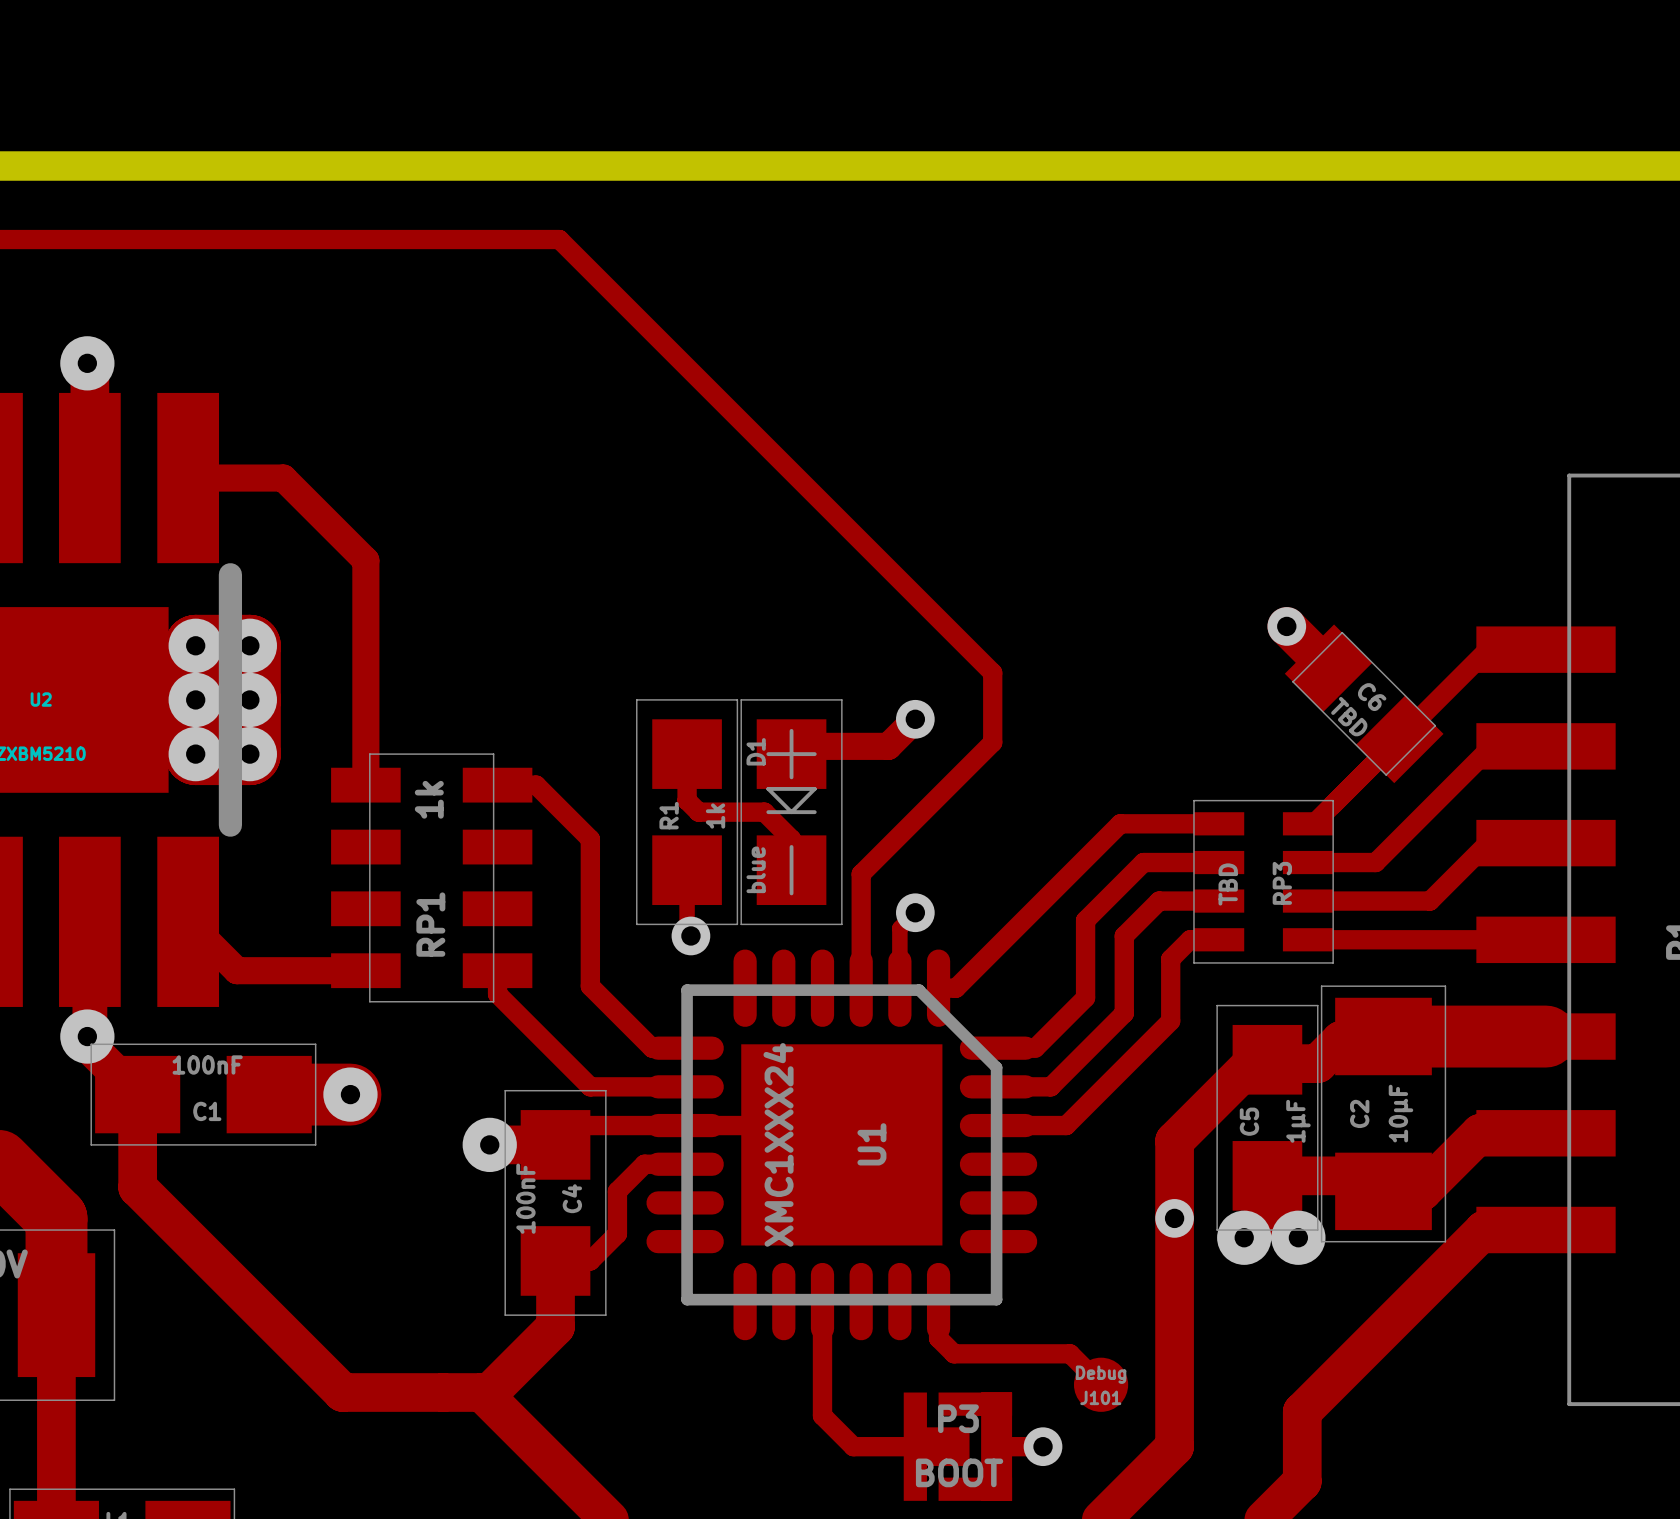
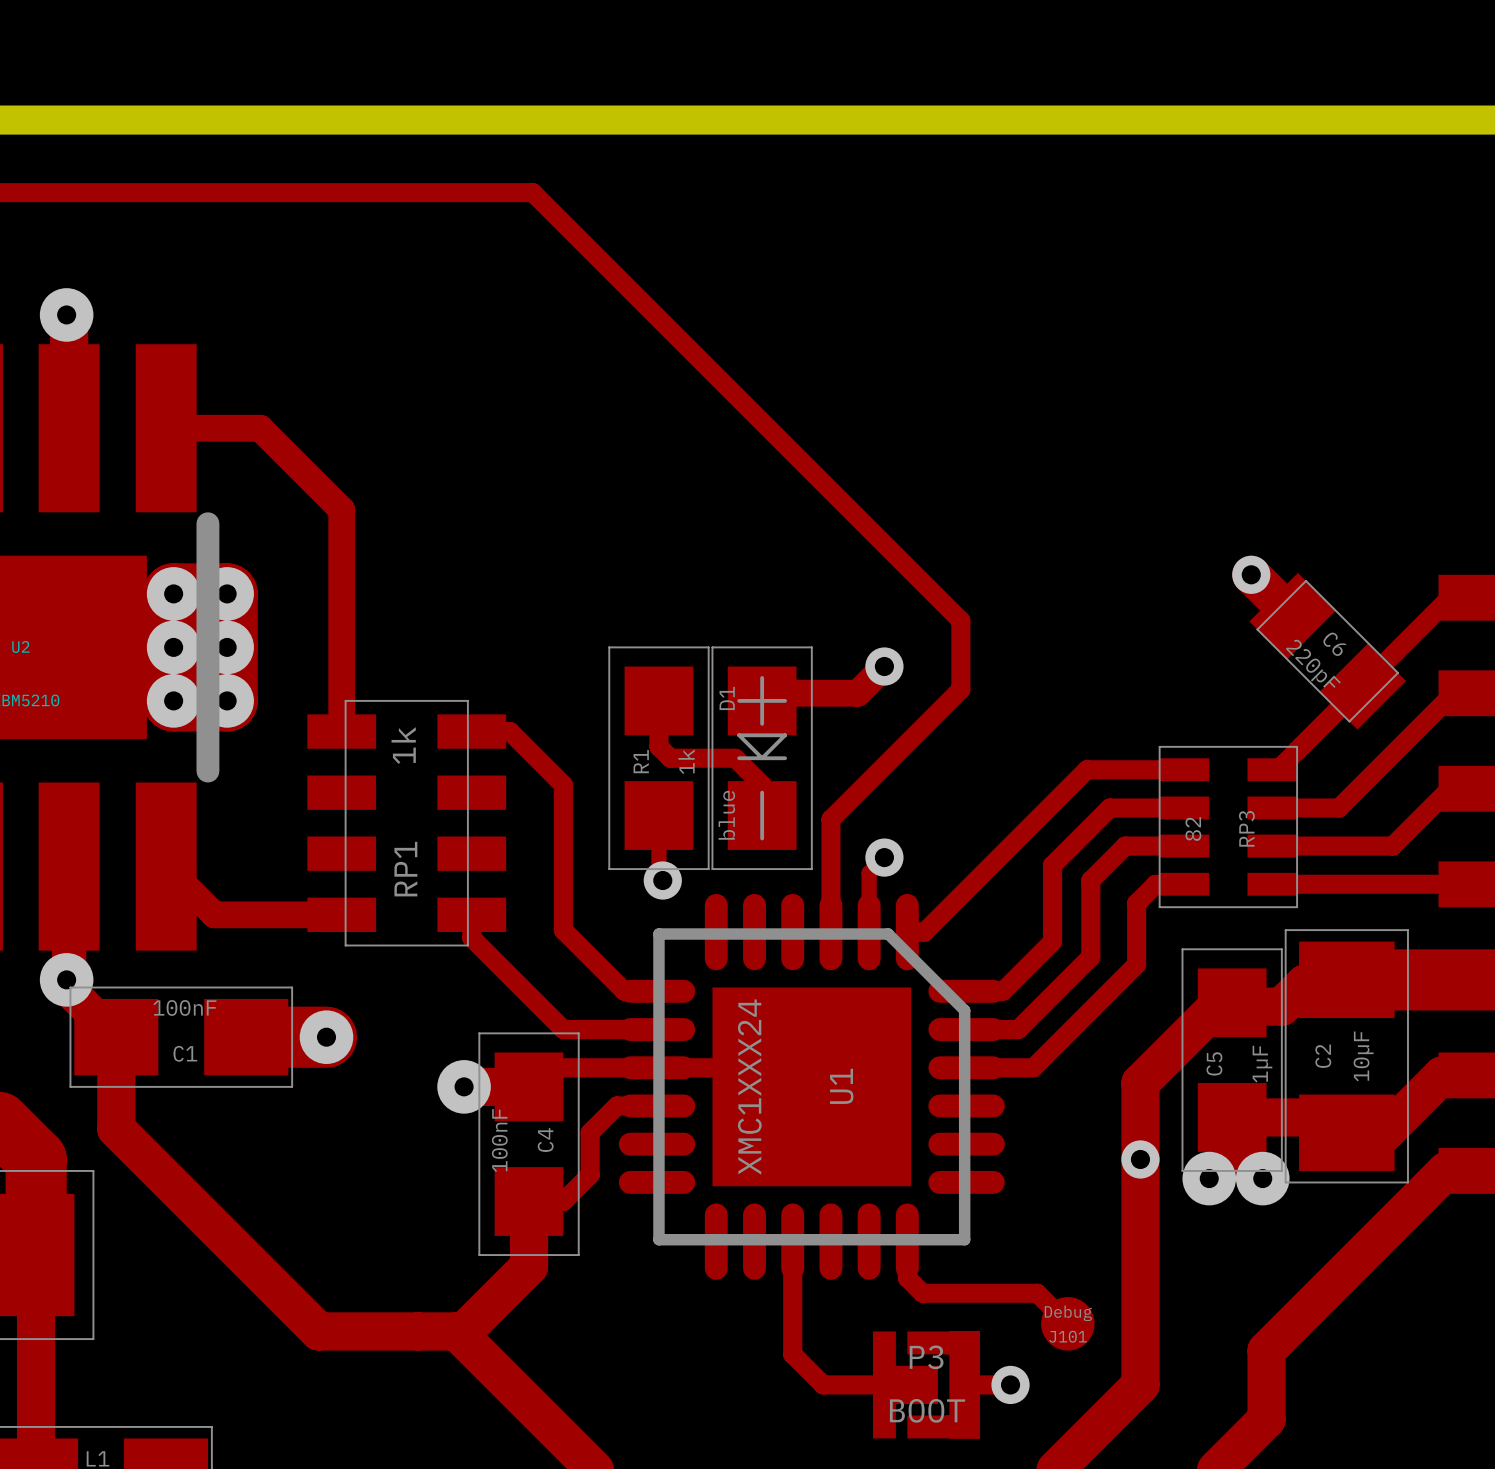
C6 value: TBD (1349, 716) -> 220pF (1313, 663)
RP3 value: TBD (1228, 884) -> 82 (1193, 829)

